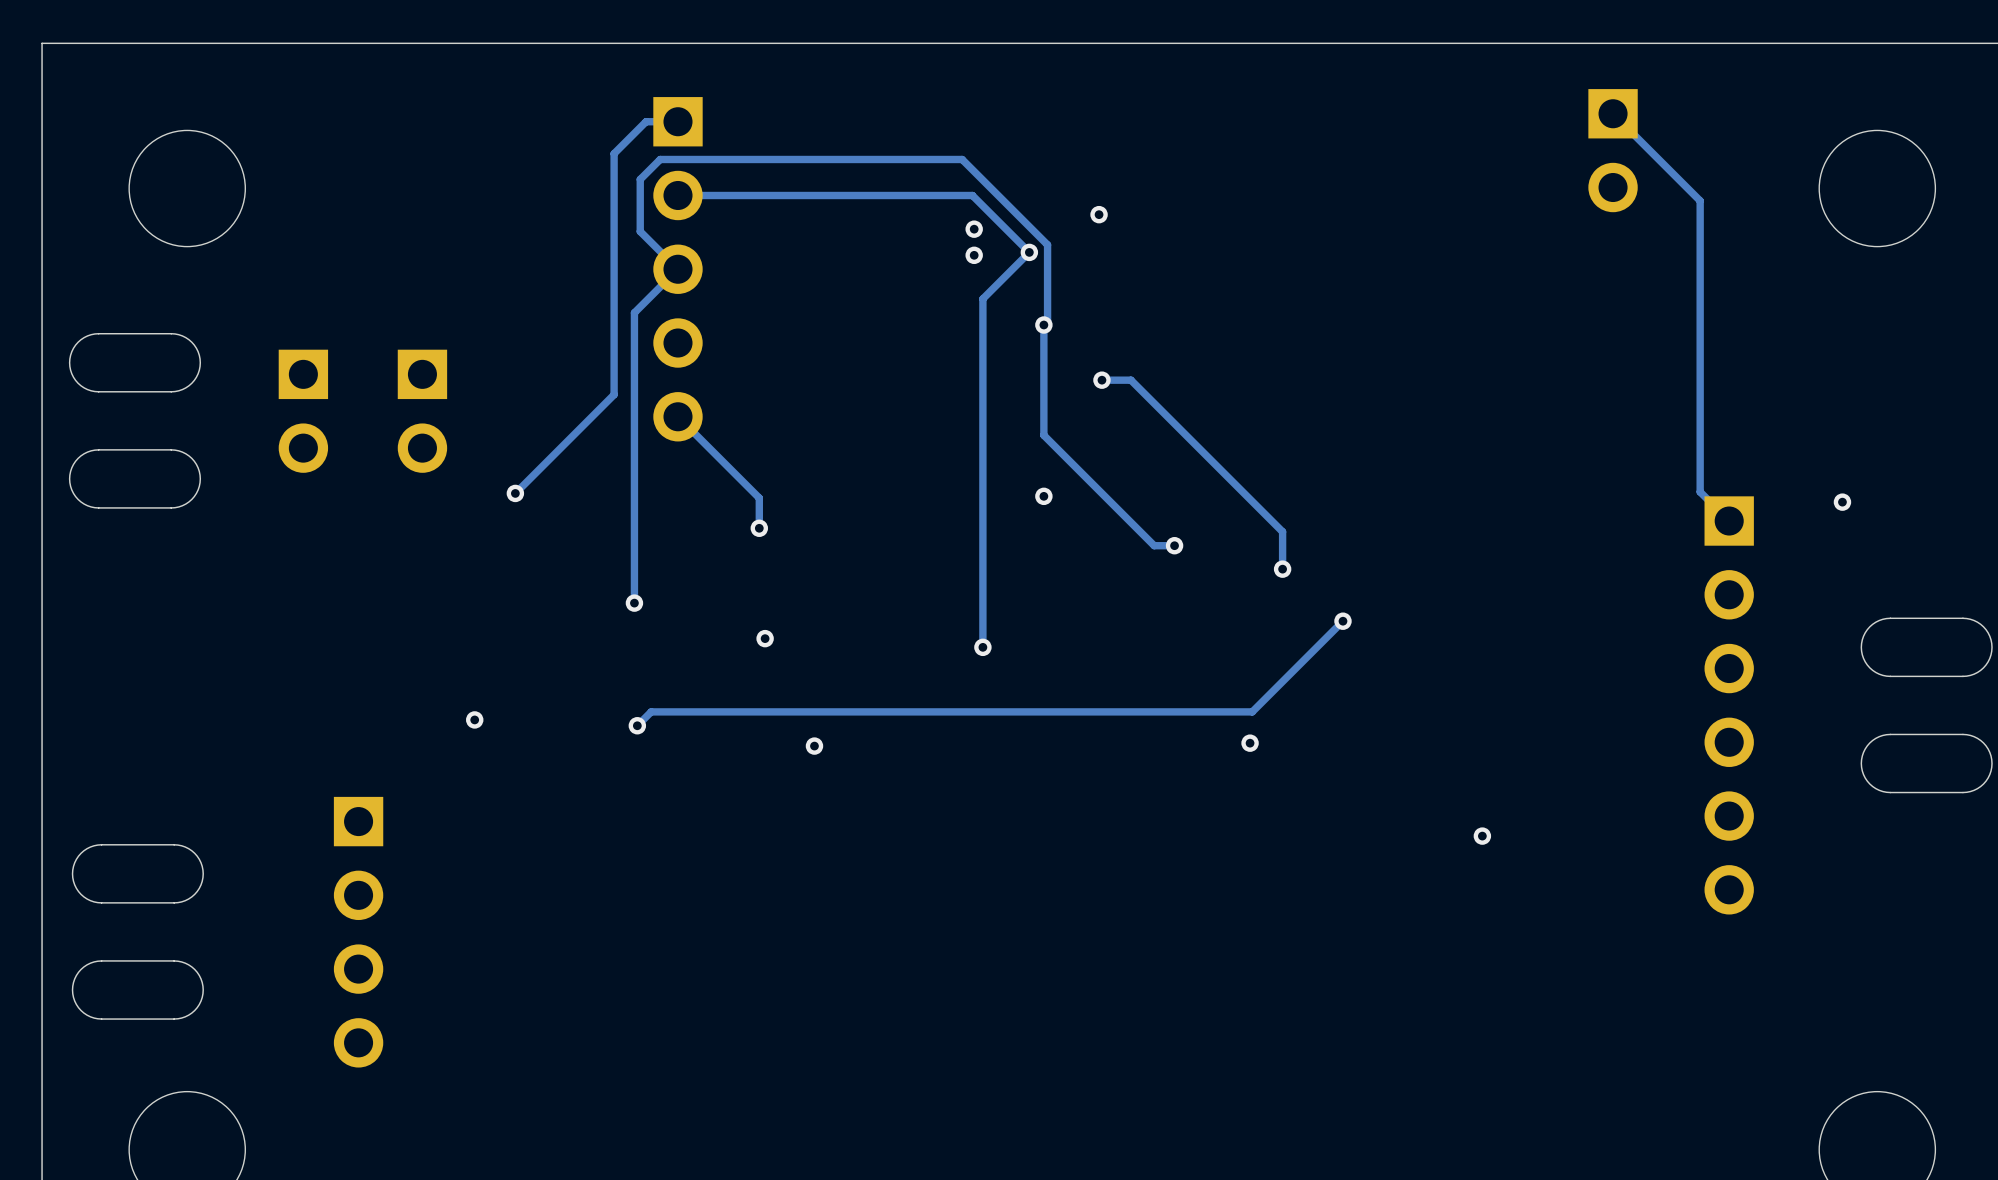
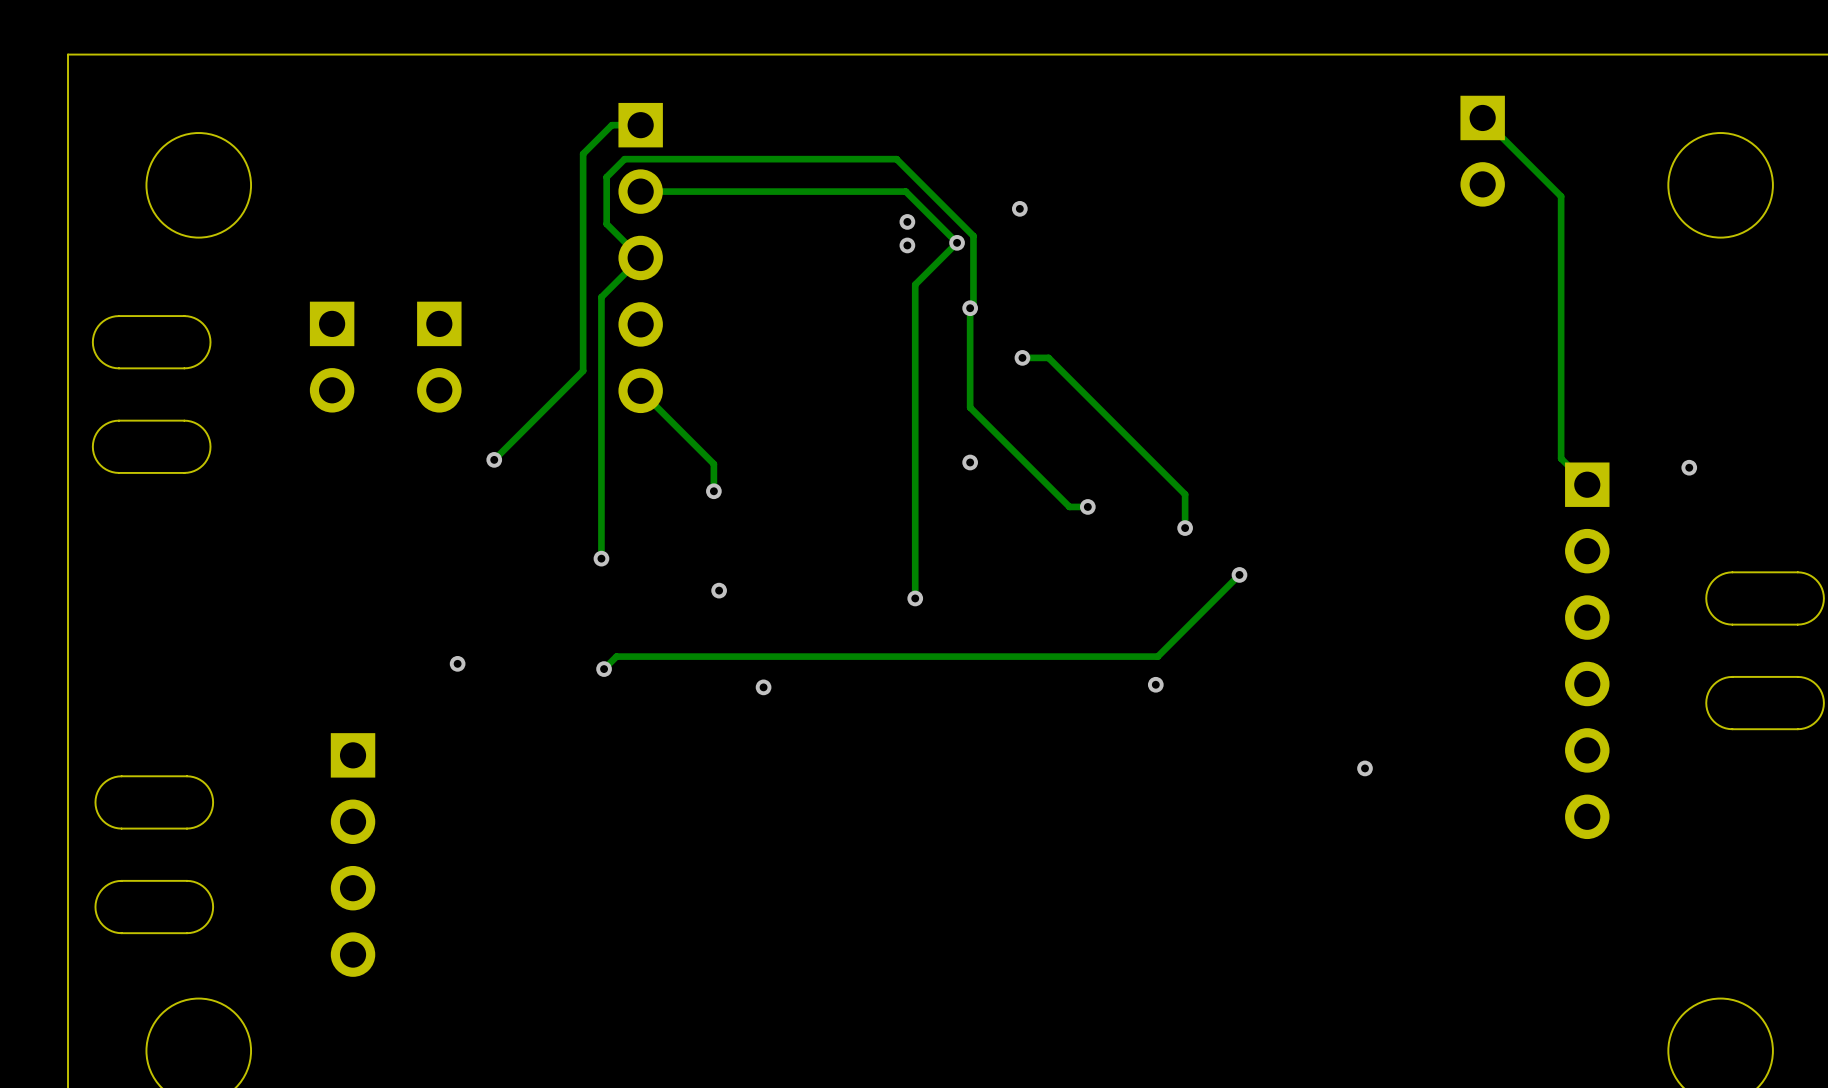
part position: (303, 411) -> (332, 357)
part position: (422, 411) -> (439, 357)

